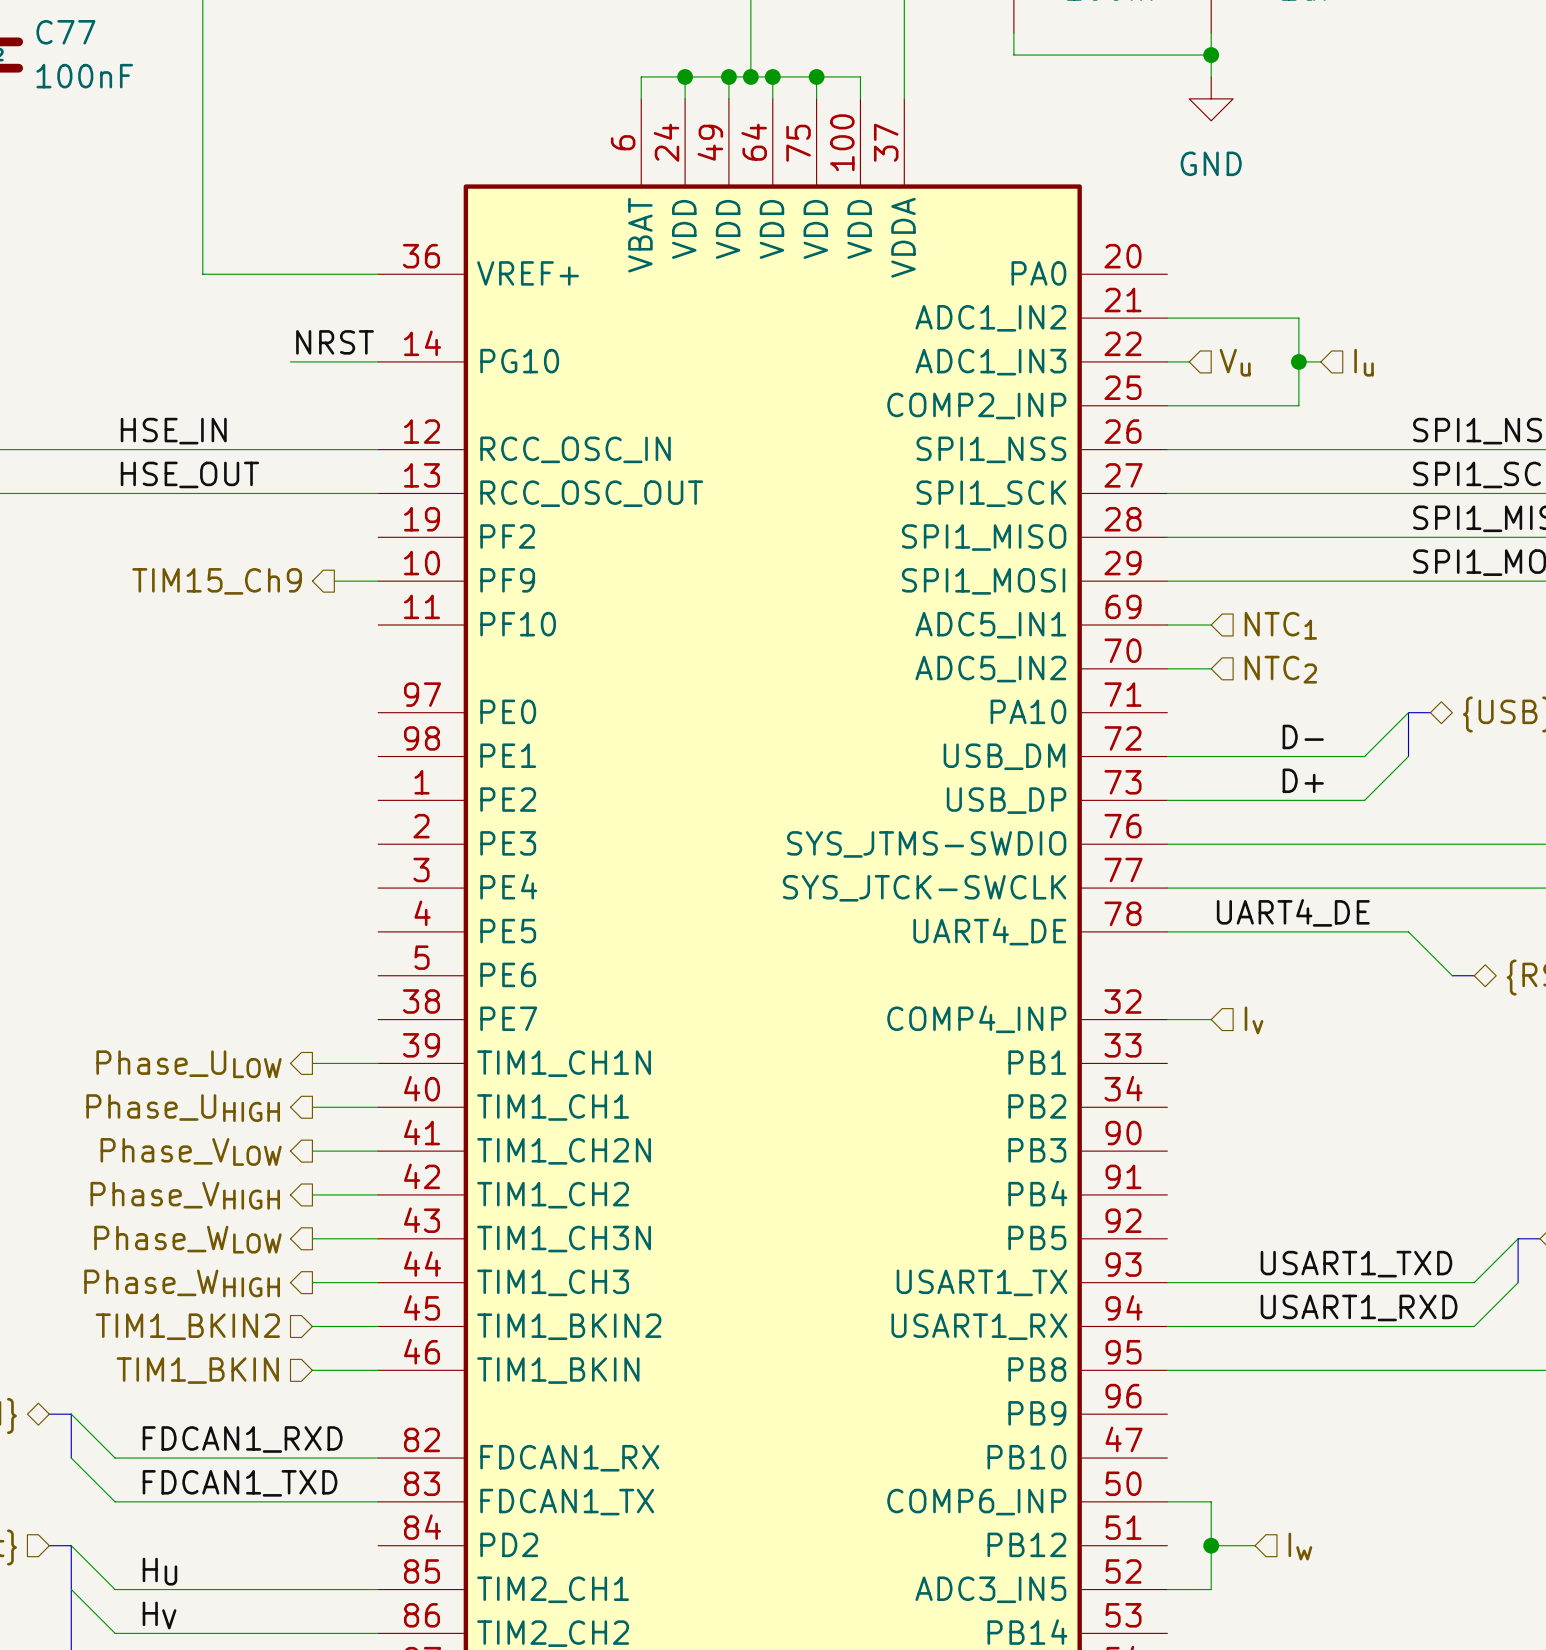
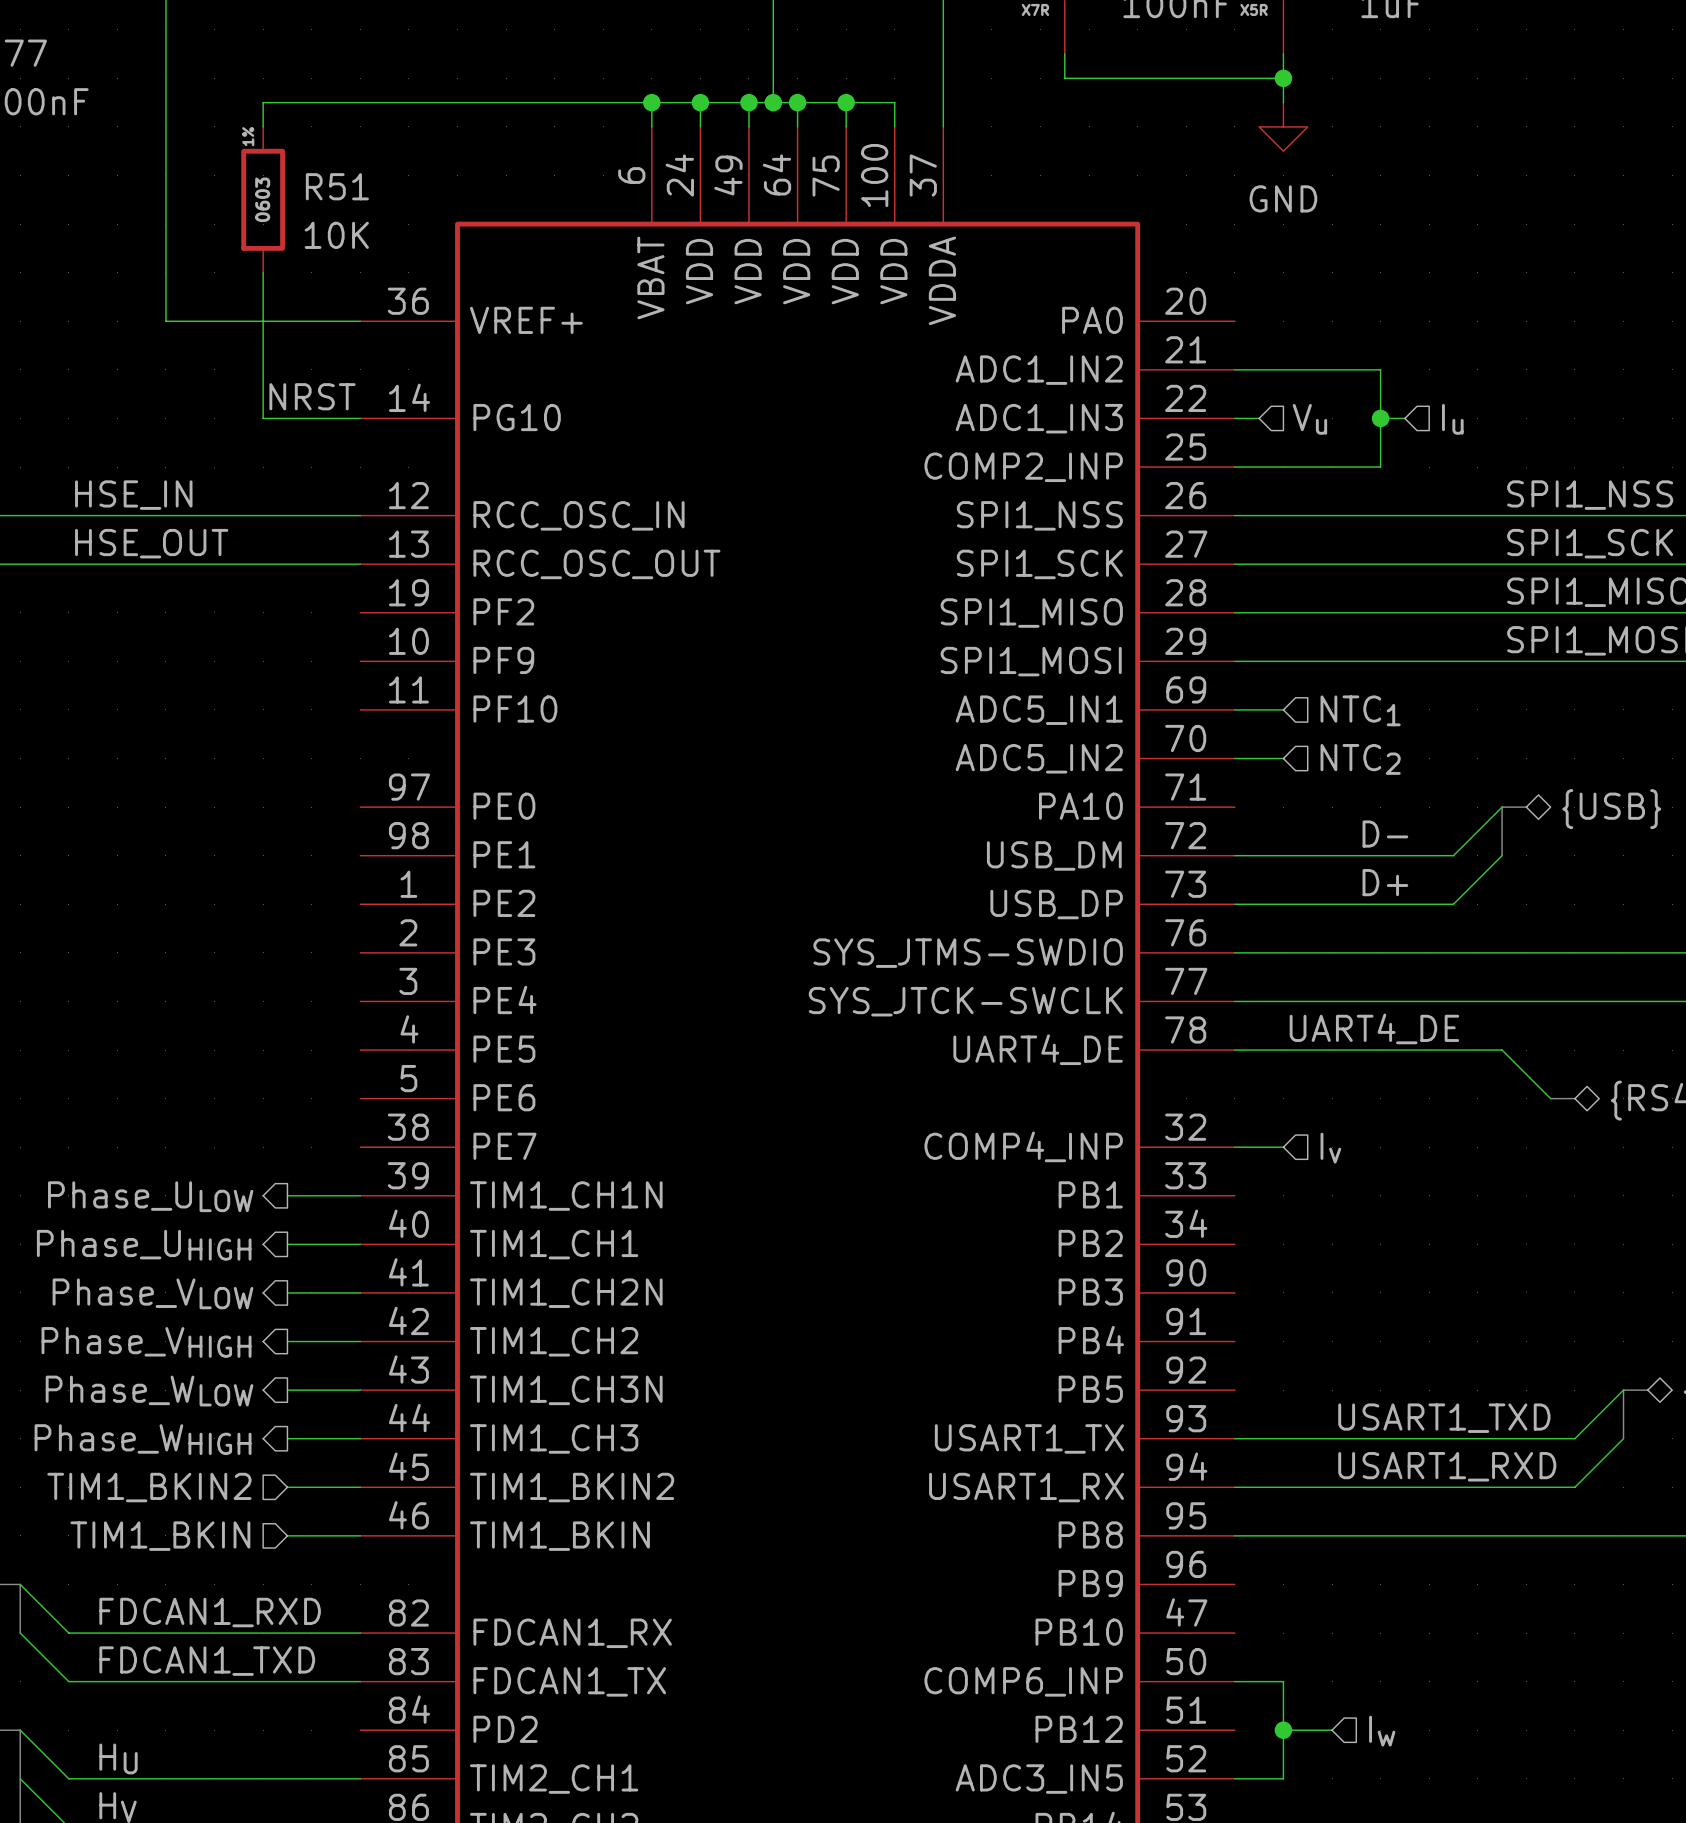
wire: none -> (651, 102) (263, 102) (263, 126)
junction: none -> (651, 102)
R51: none -> 10K (263, 199)
wire: none -> (263, 272) (263, 418)
hierarchical label: TIM15_Ch9 (217, 581) -> none
wire: (334, 581) (378, 581) -> none

